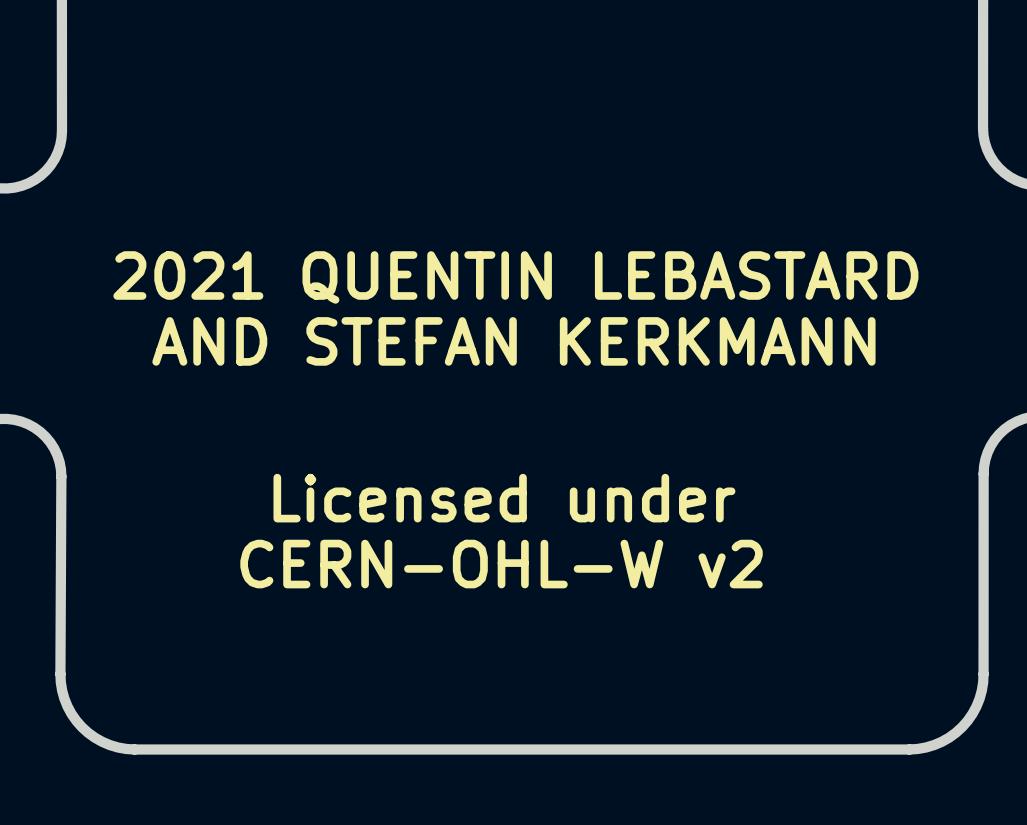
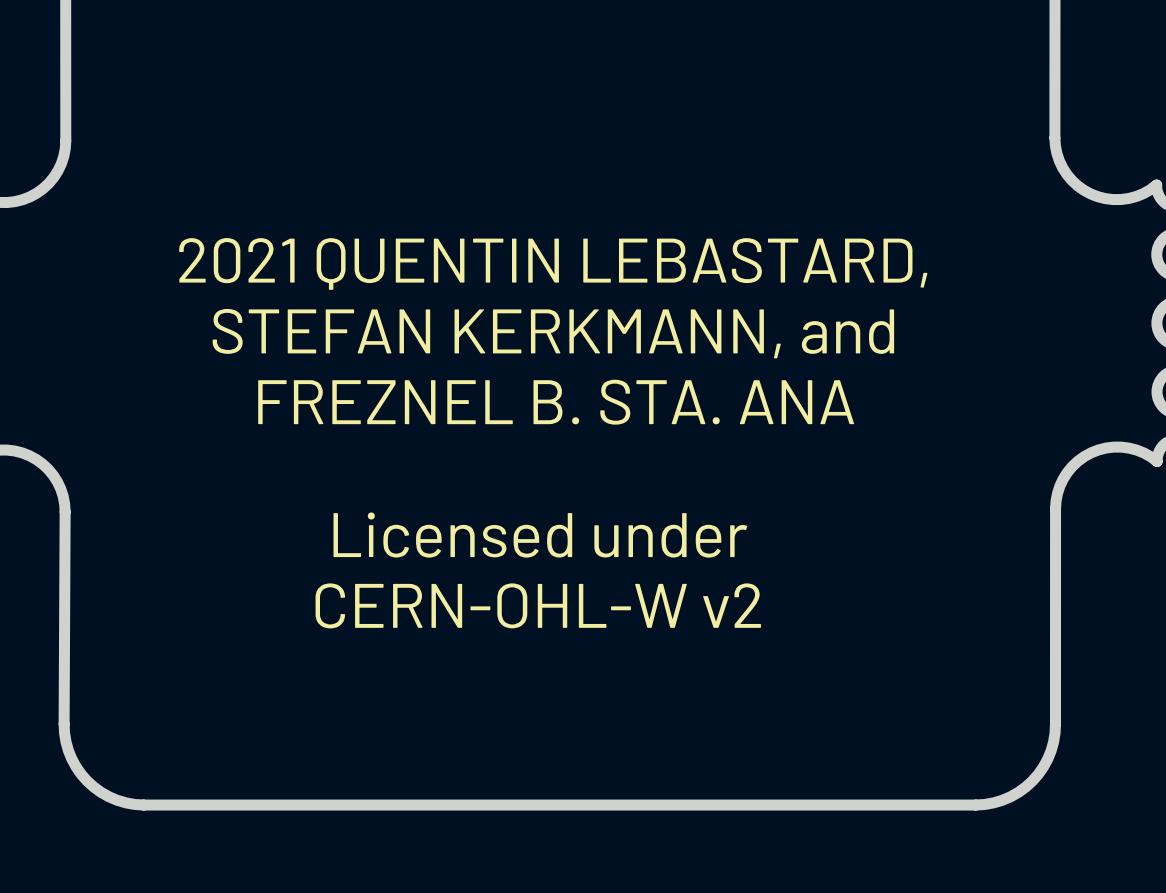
text: 2021 QUENTIN LEBASTARD (515, 277) -> 2021 QUENTIN LEBASTARD, (553, 263)
text: AND STEFAN KERKMANN (513, 341) -> STEFAN KERKMANN, and (553, 333)
text: none -> FREZNEL B. STA. ANA (556, 402)

